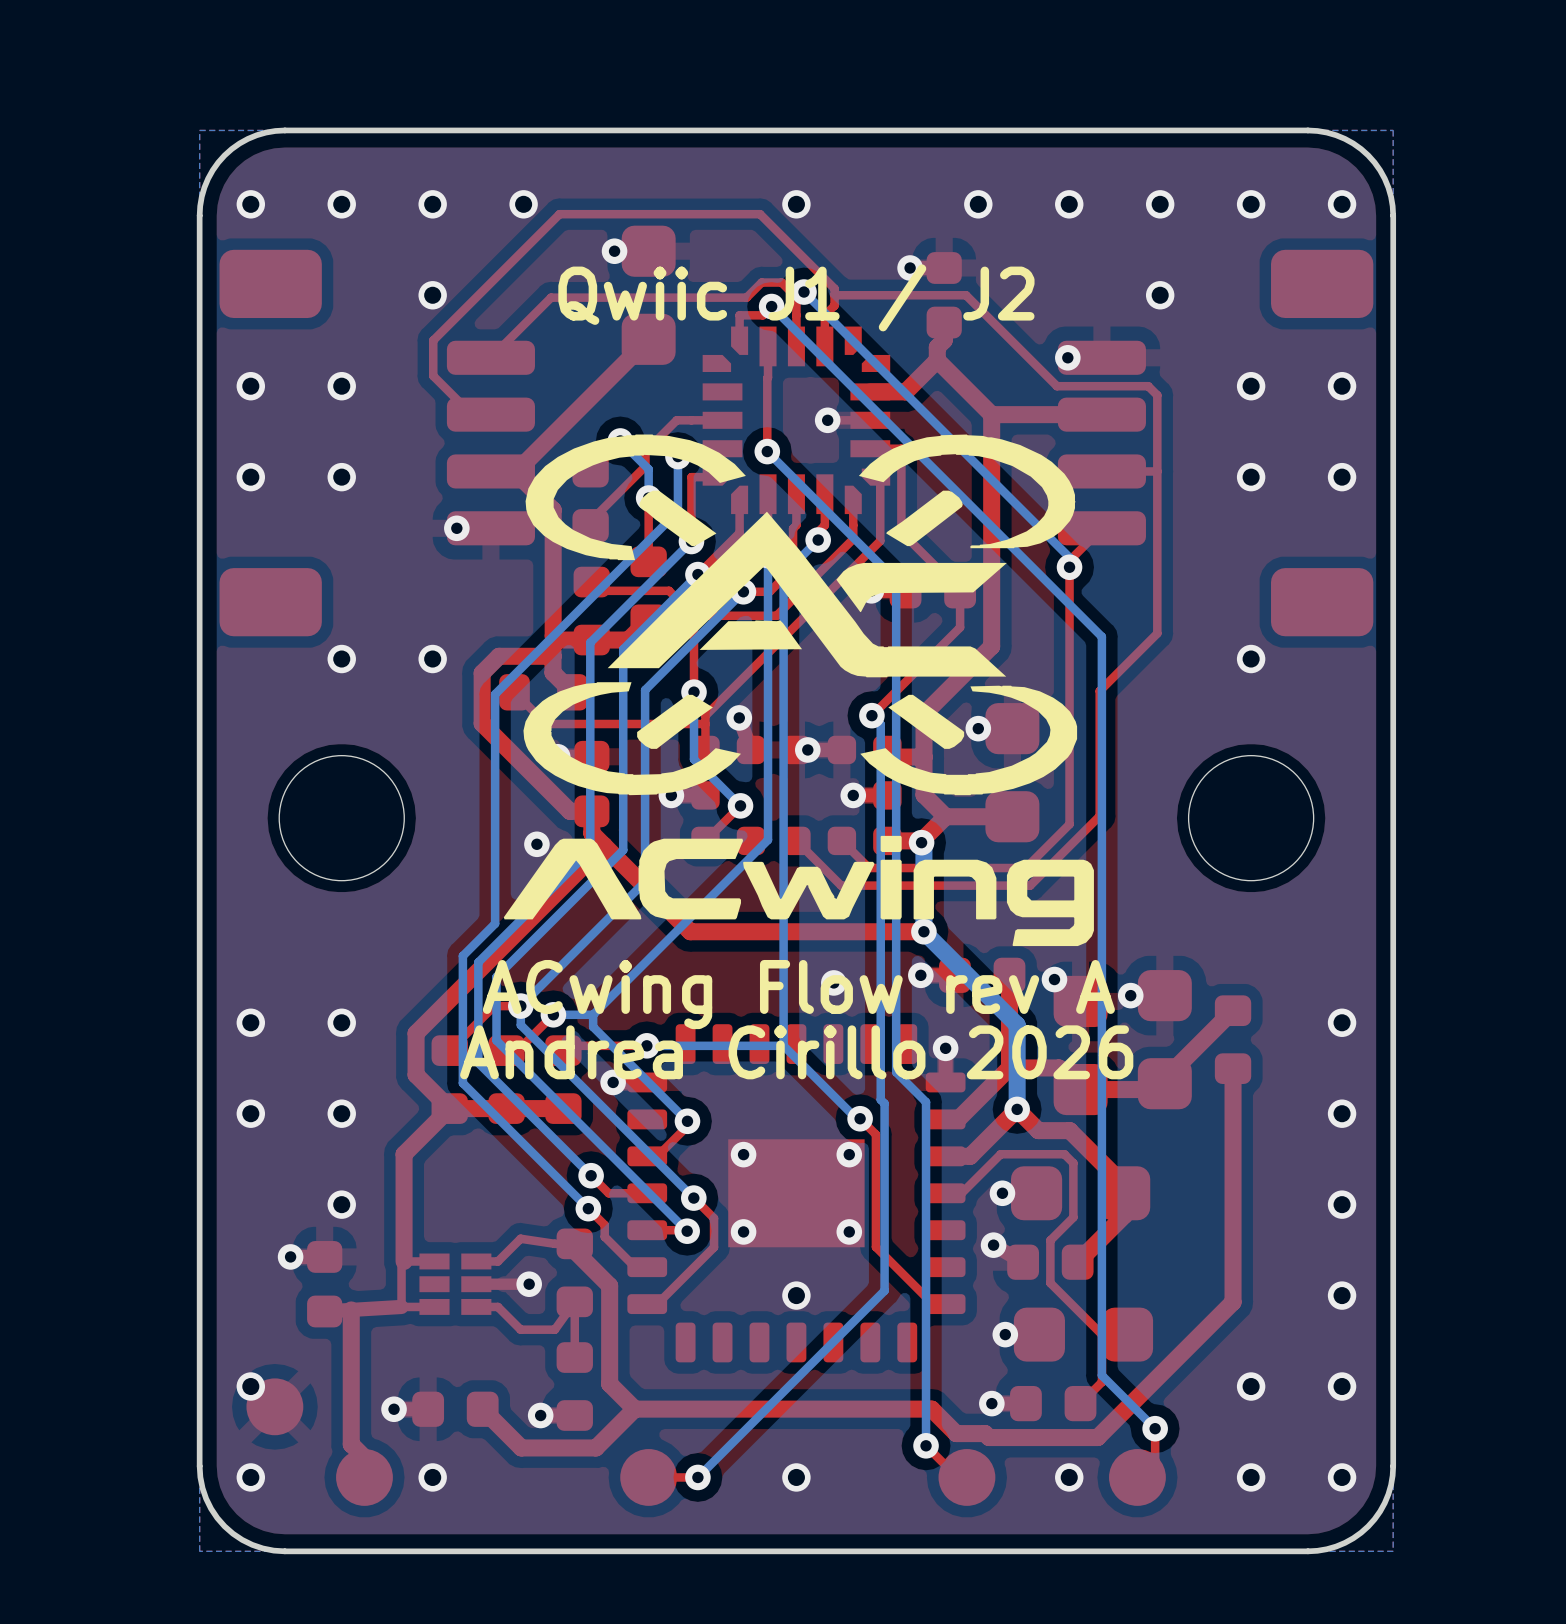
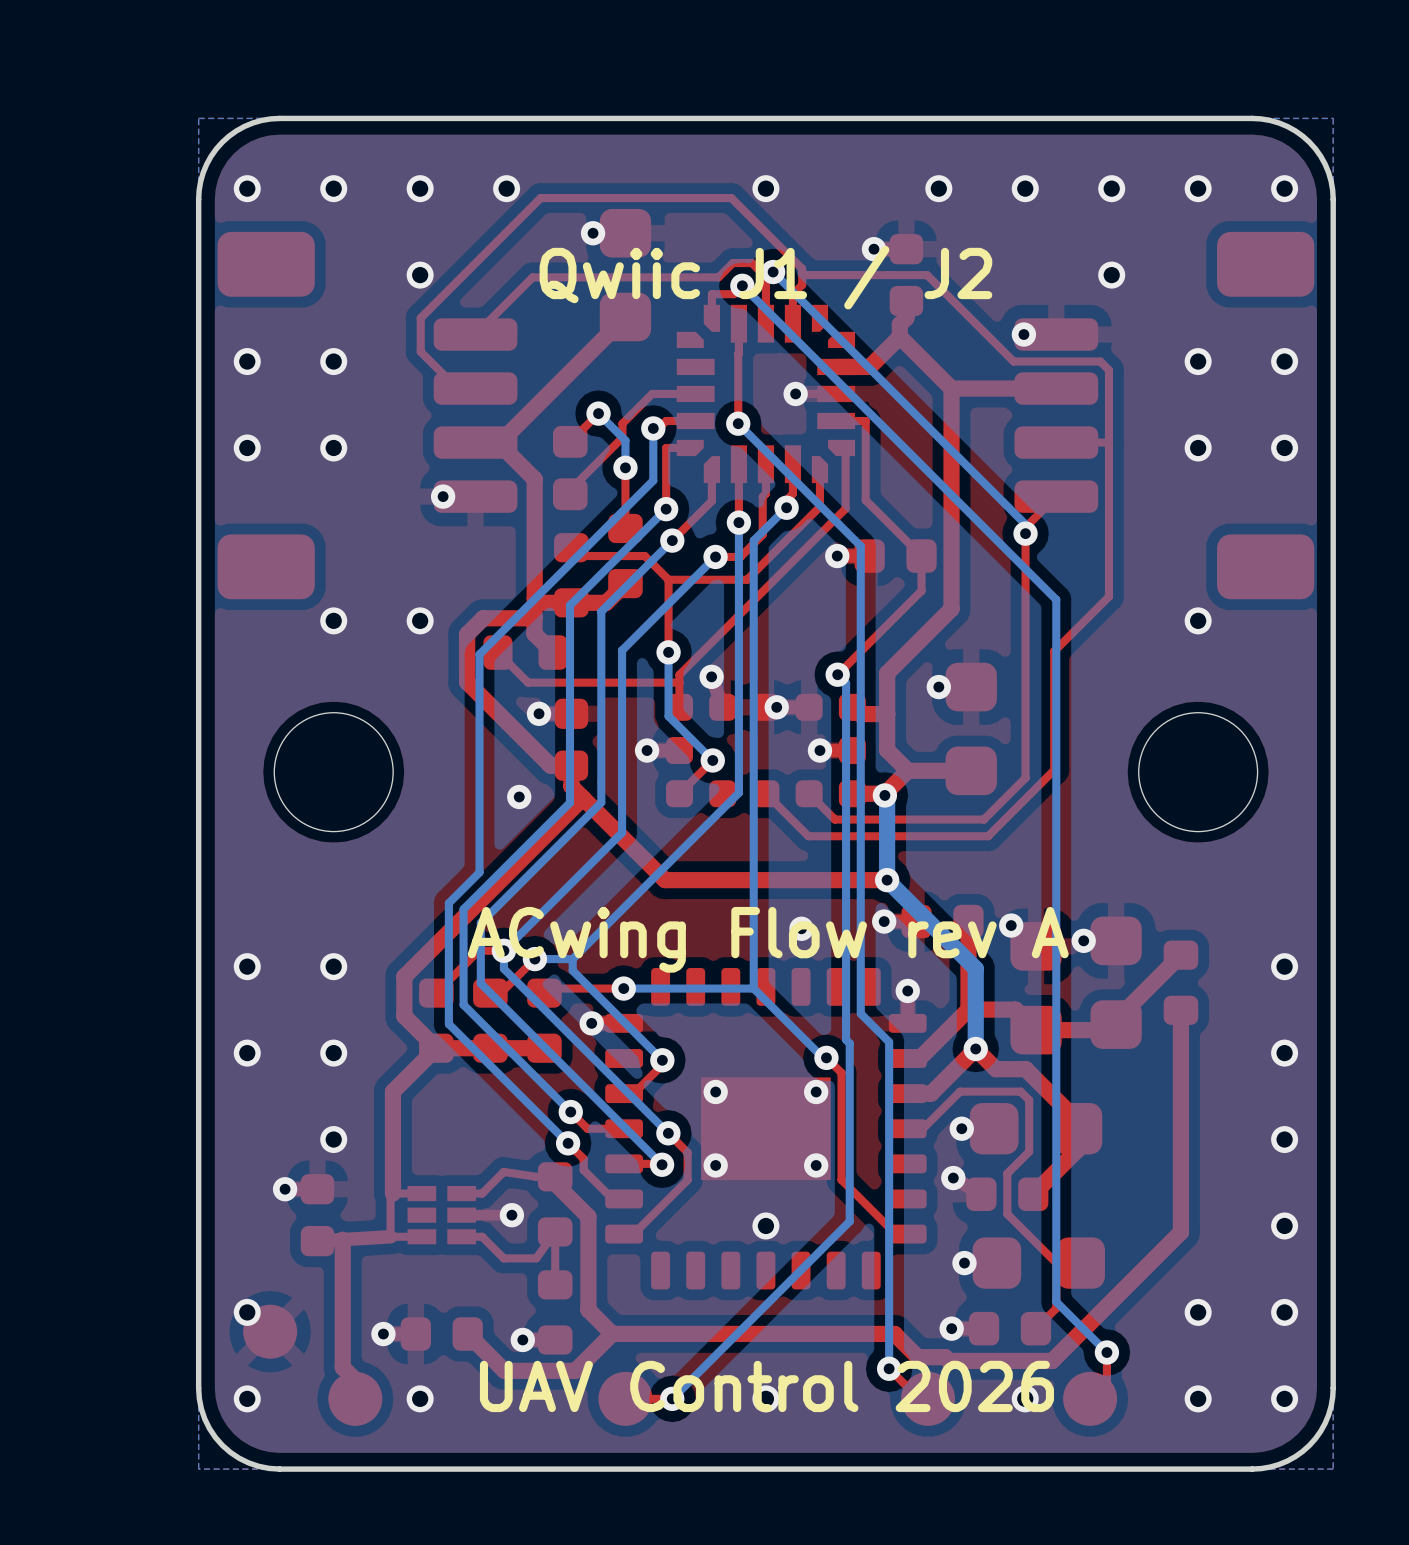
drawing: [503, 434, 1094, 947] -> none
text: Andrea Cirillo 2026 (796, 1052) -> none
text: none -> UAV Control 2026 (766, 1386)

